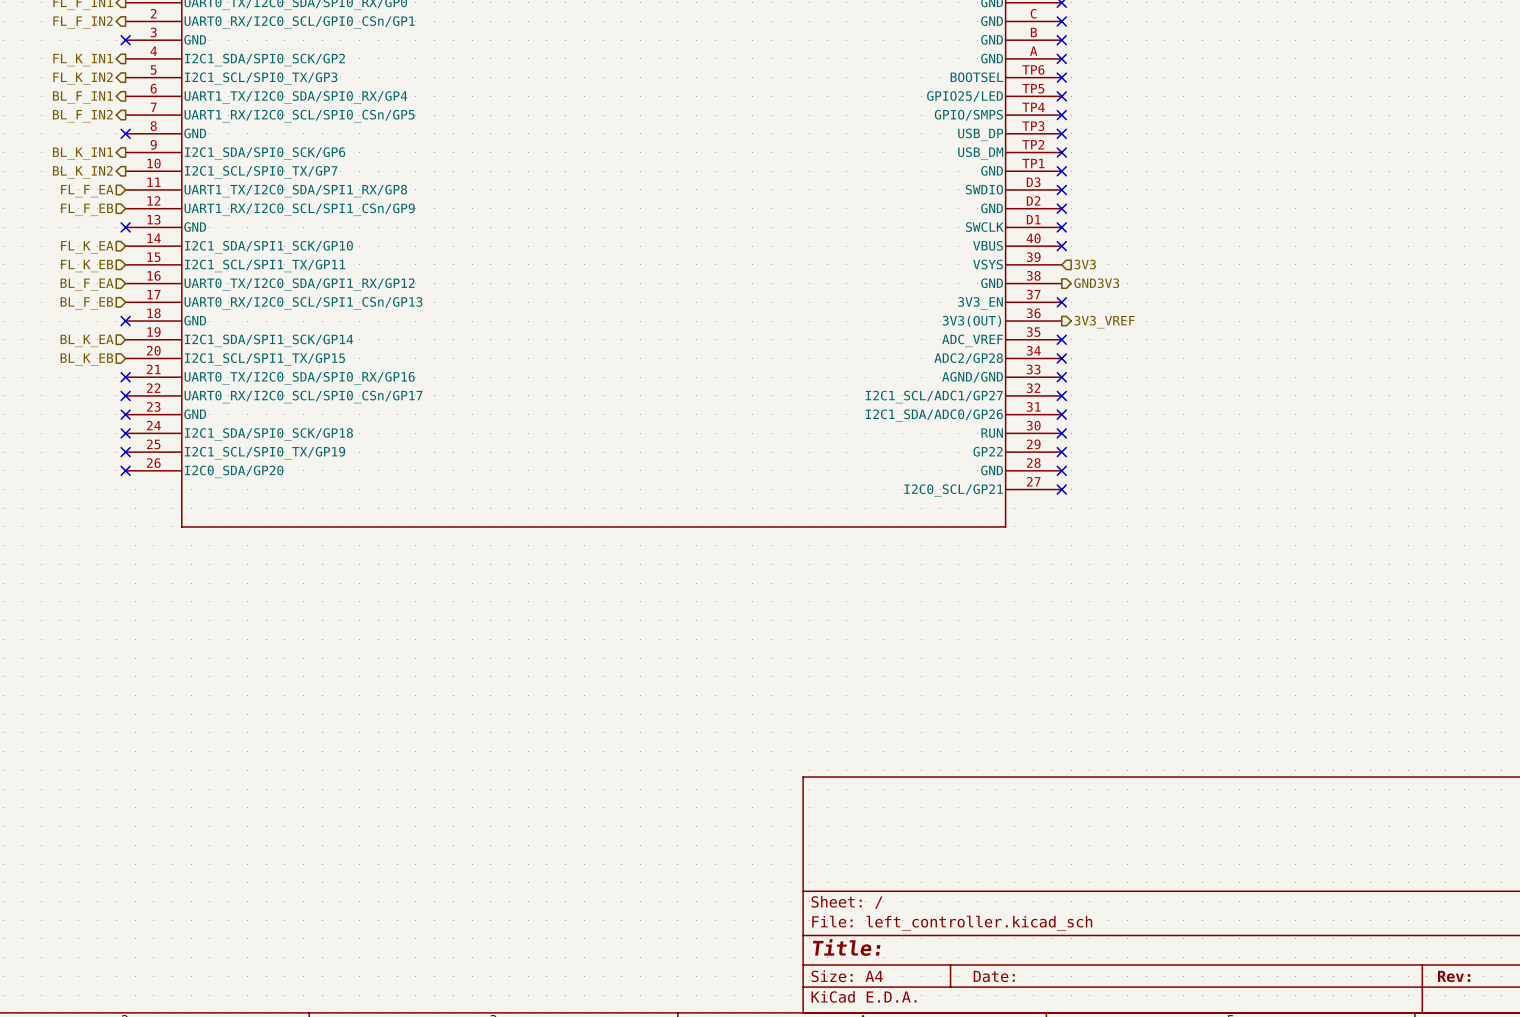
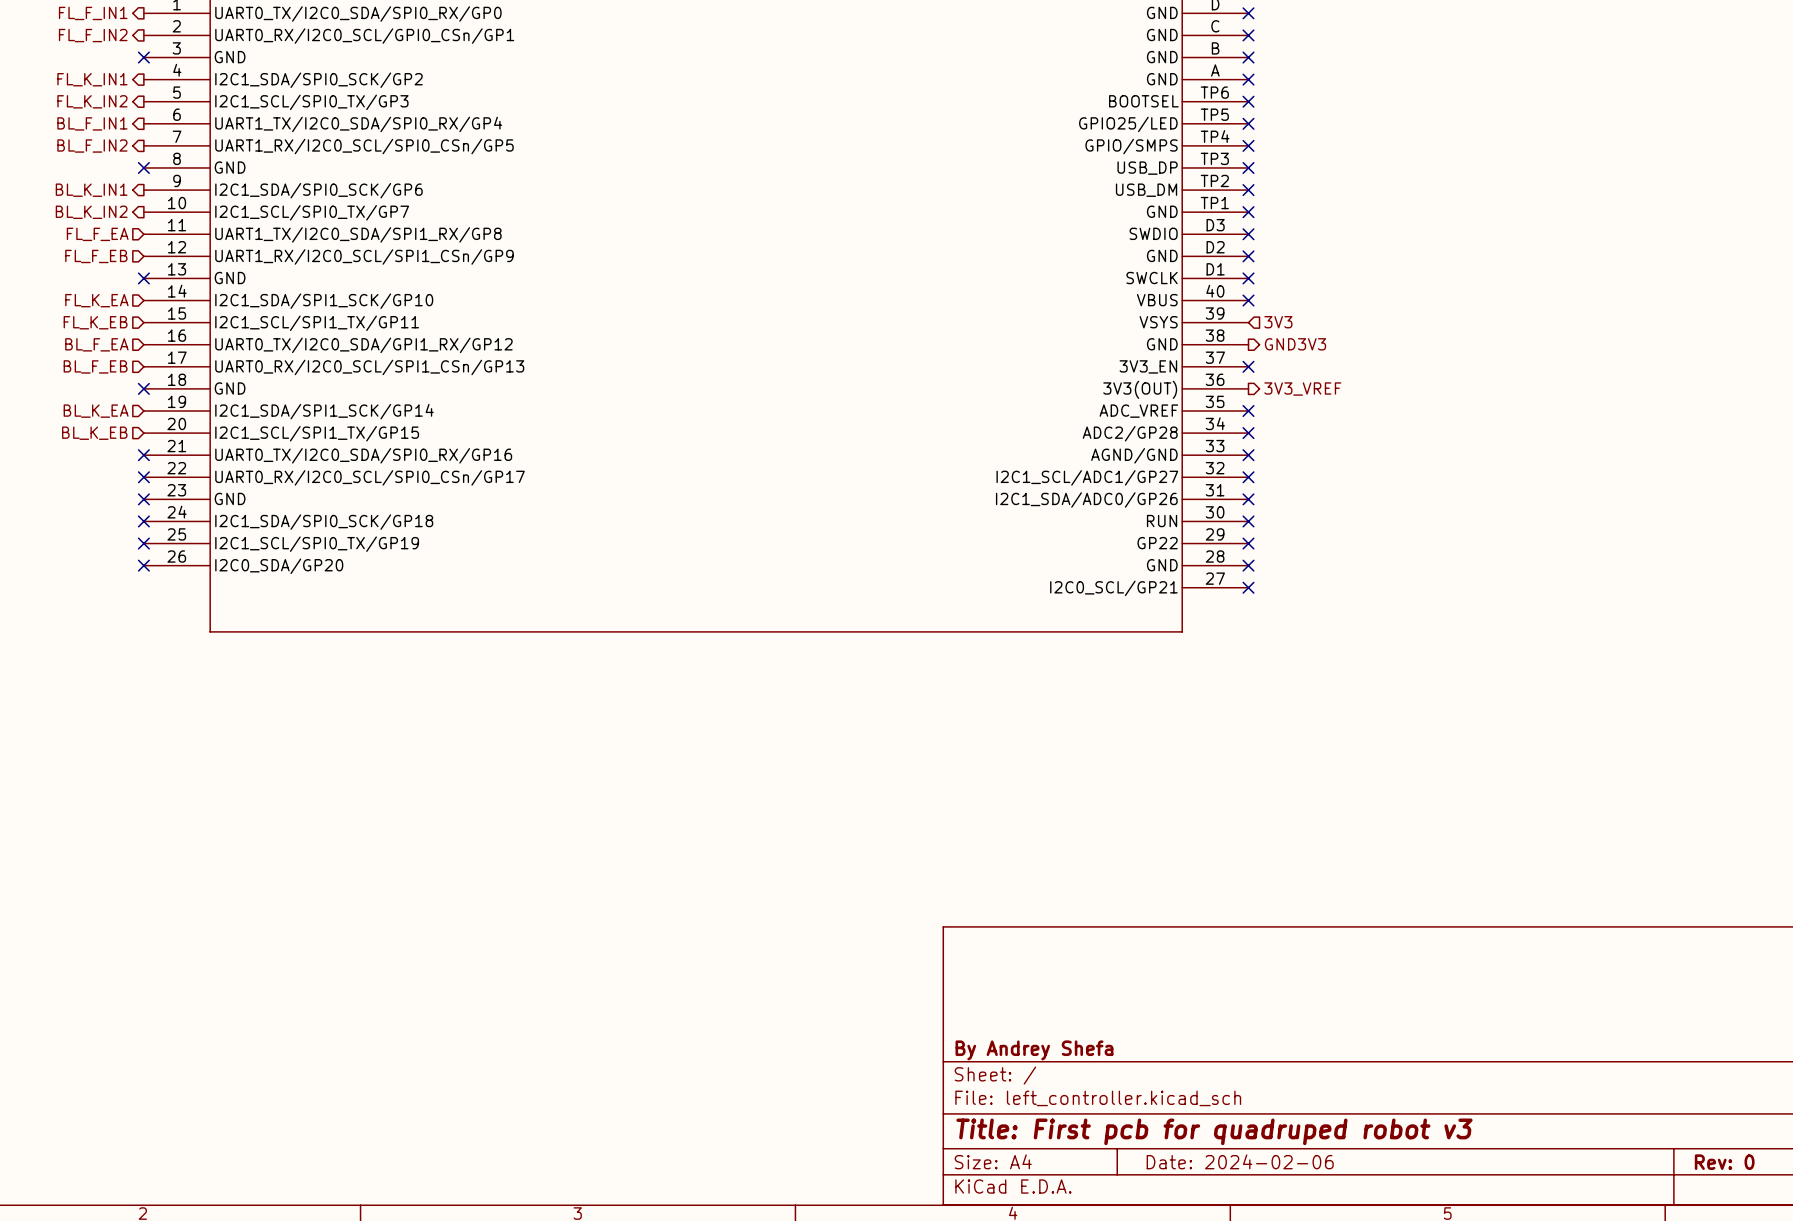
title block: none -> By Andrey Shefa (1034, 1050)
title block: Title: (846, 947) -> Title: First pcb for quadruped robot v3 (1214, 1131)
title block: Date: (994, 976) -> Date: 2024-02-06 (1240, 1161)
title block: Rev: (1454, 976) -> Rev: 0 (1724, 1162)

